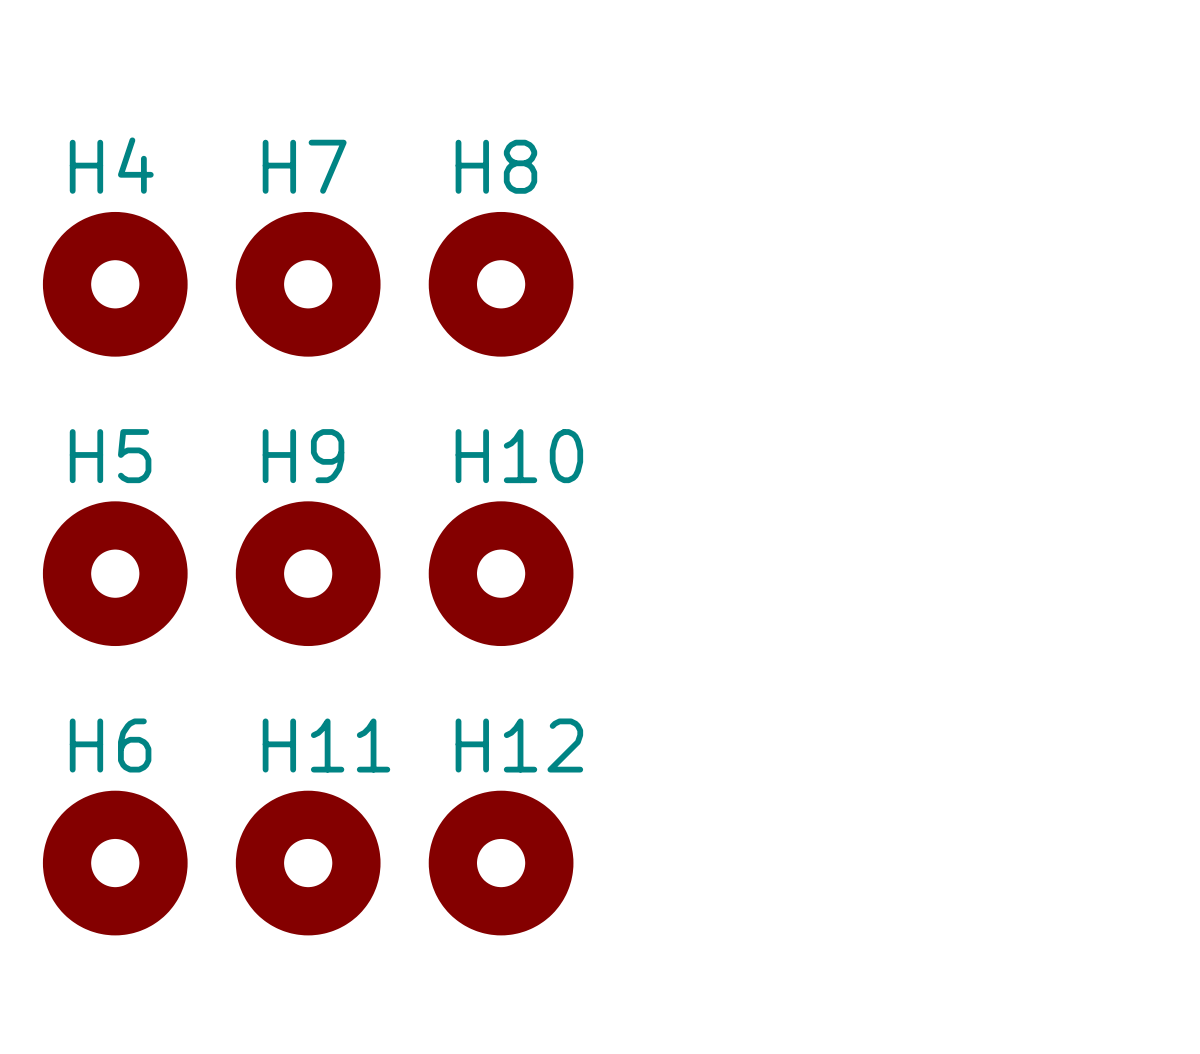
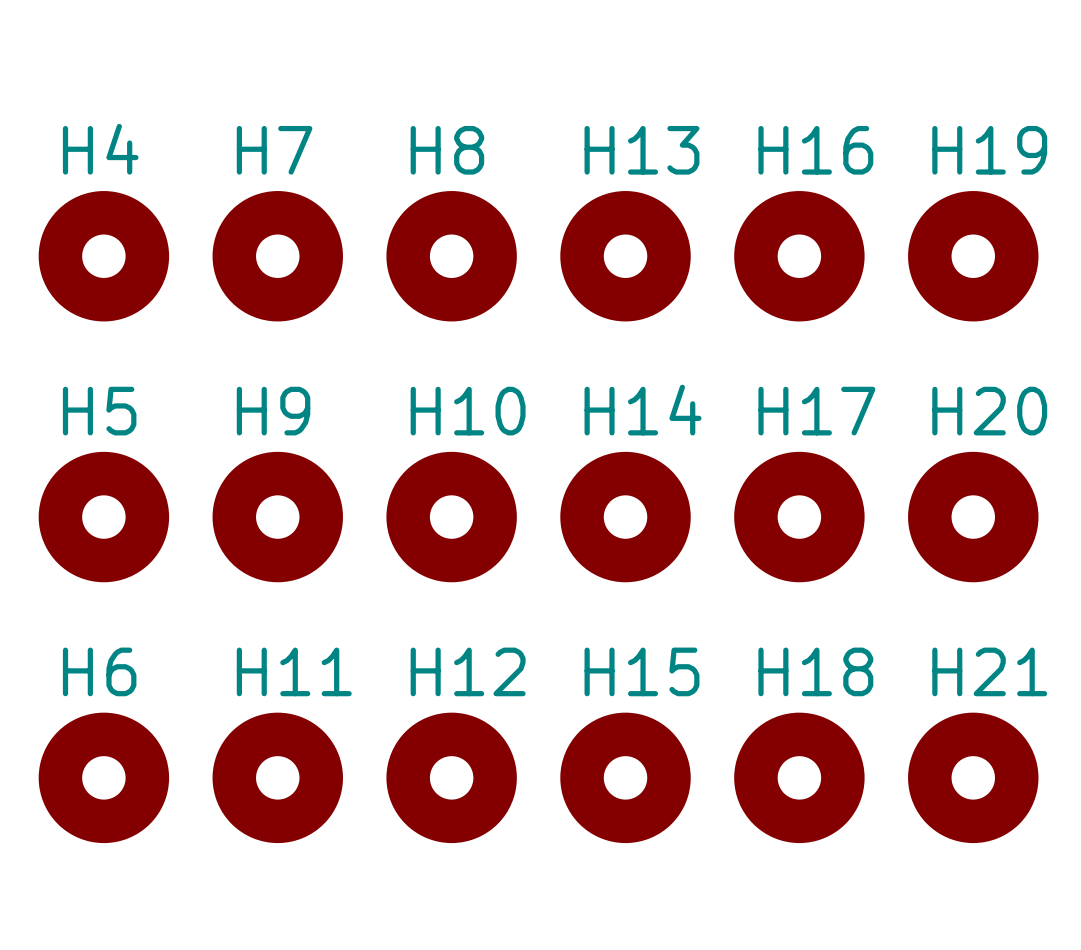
H13: none -> (625, 256)
H16: none -> (799, 256)
H19: none -> (973, 256)
H14: none -> (625, 517)
H17: none -> (799, 517)
H20: none -> (973, 517)
H15: none -> (625, 777)
H18: none -> (799, 777)
H21: none -> (973, 777)

